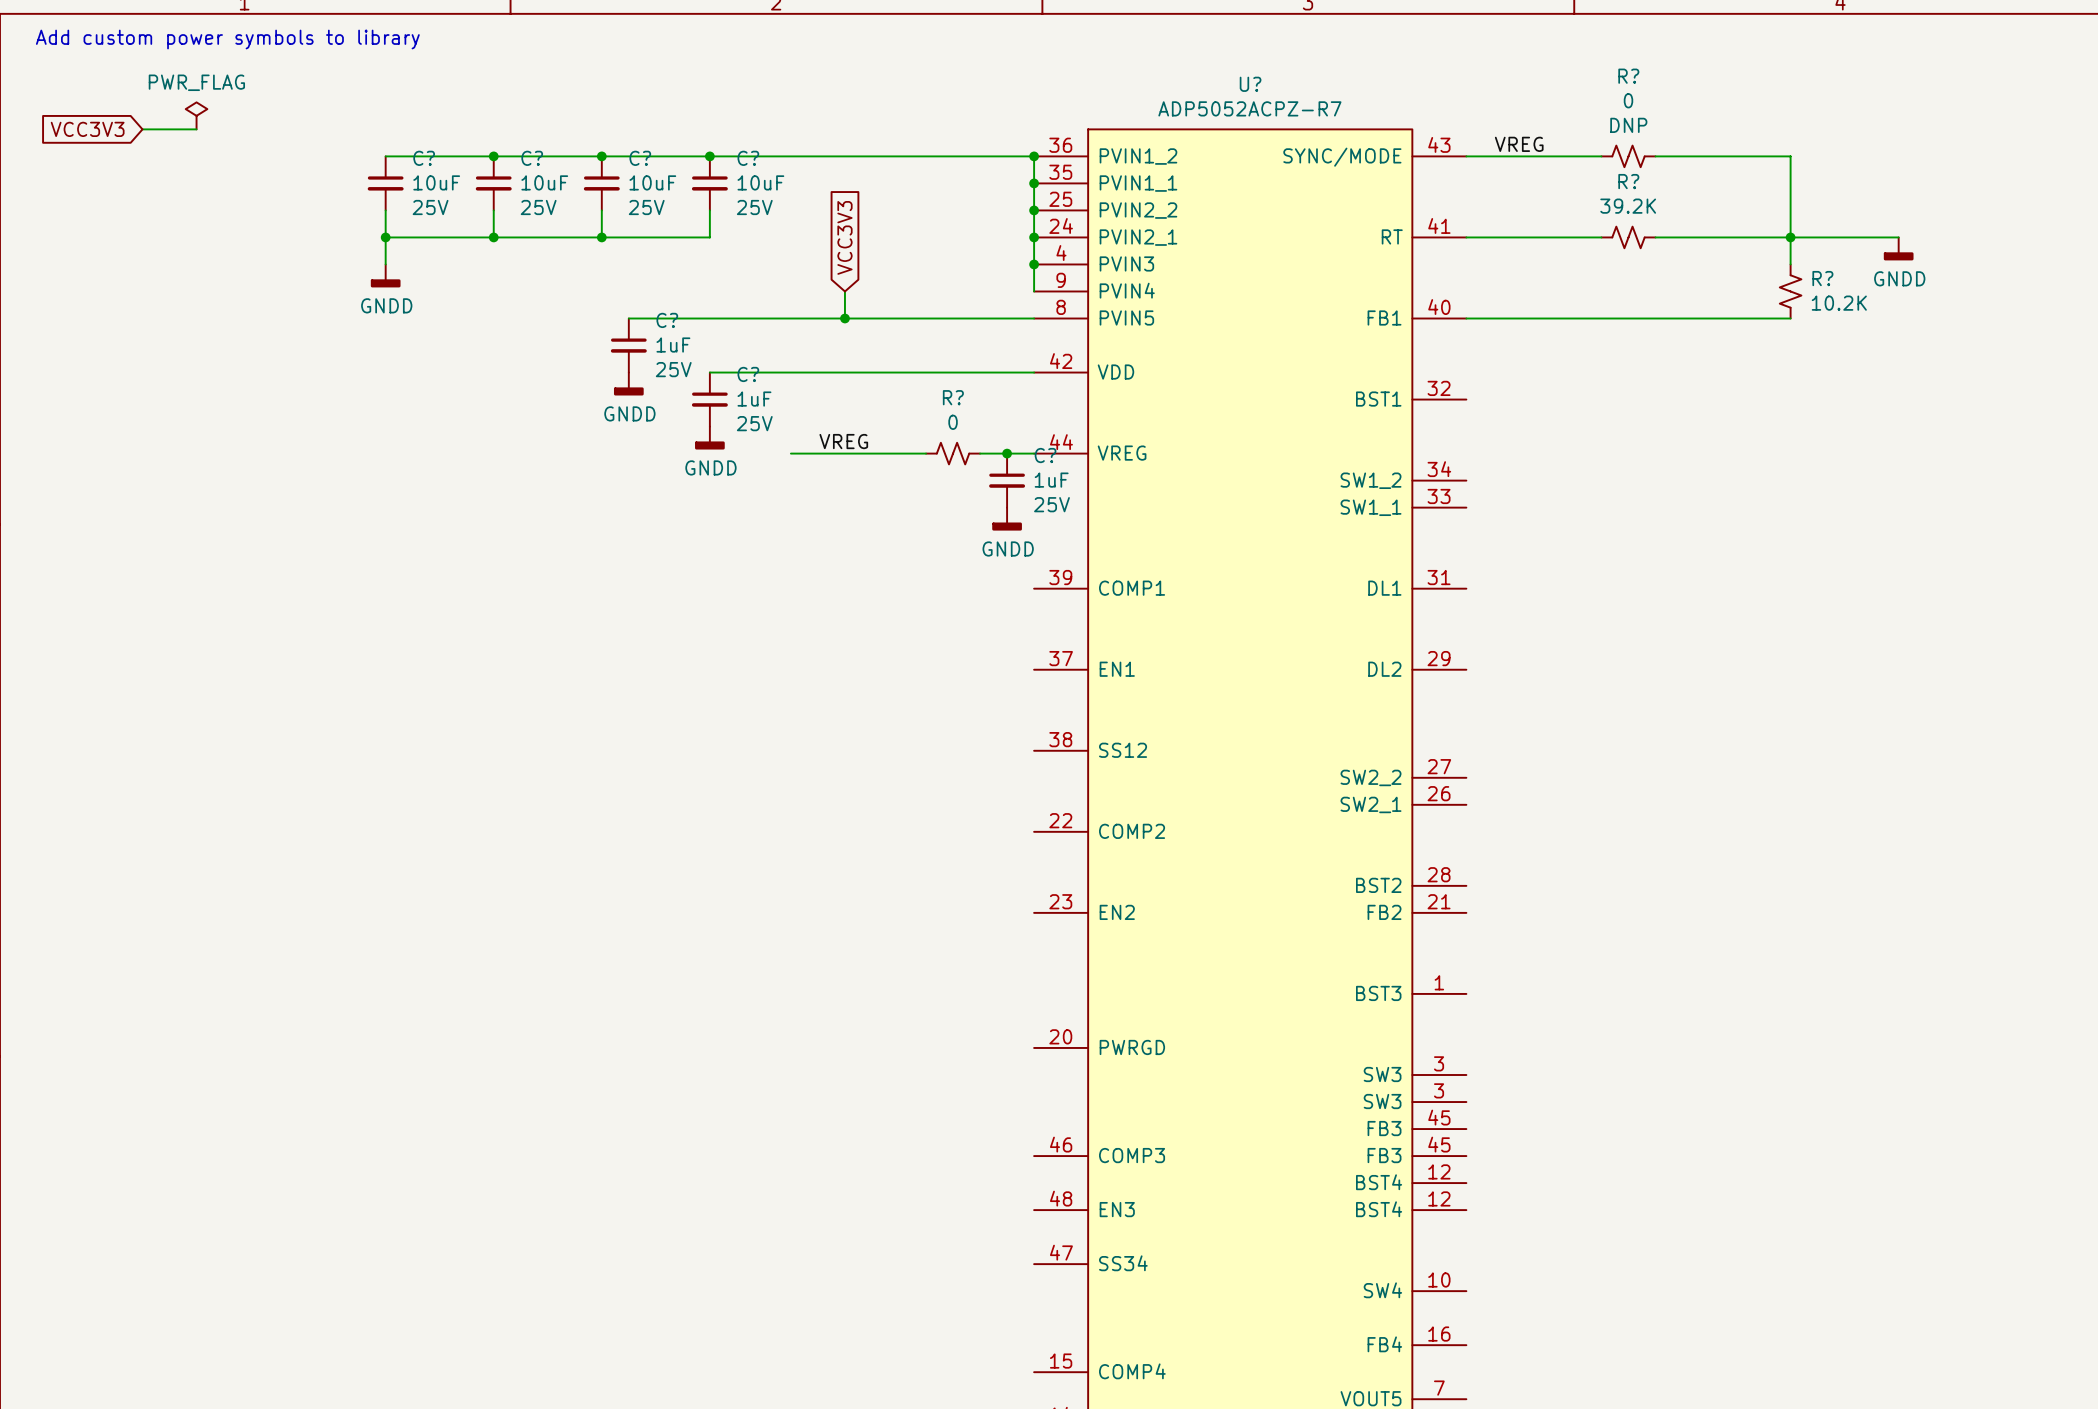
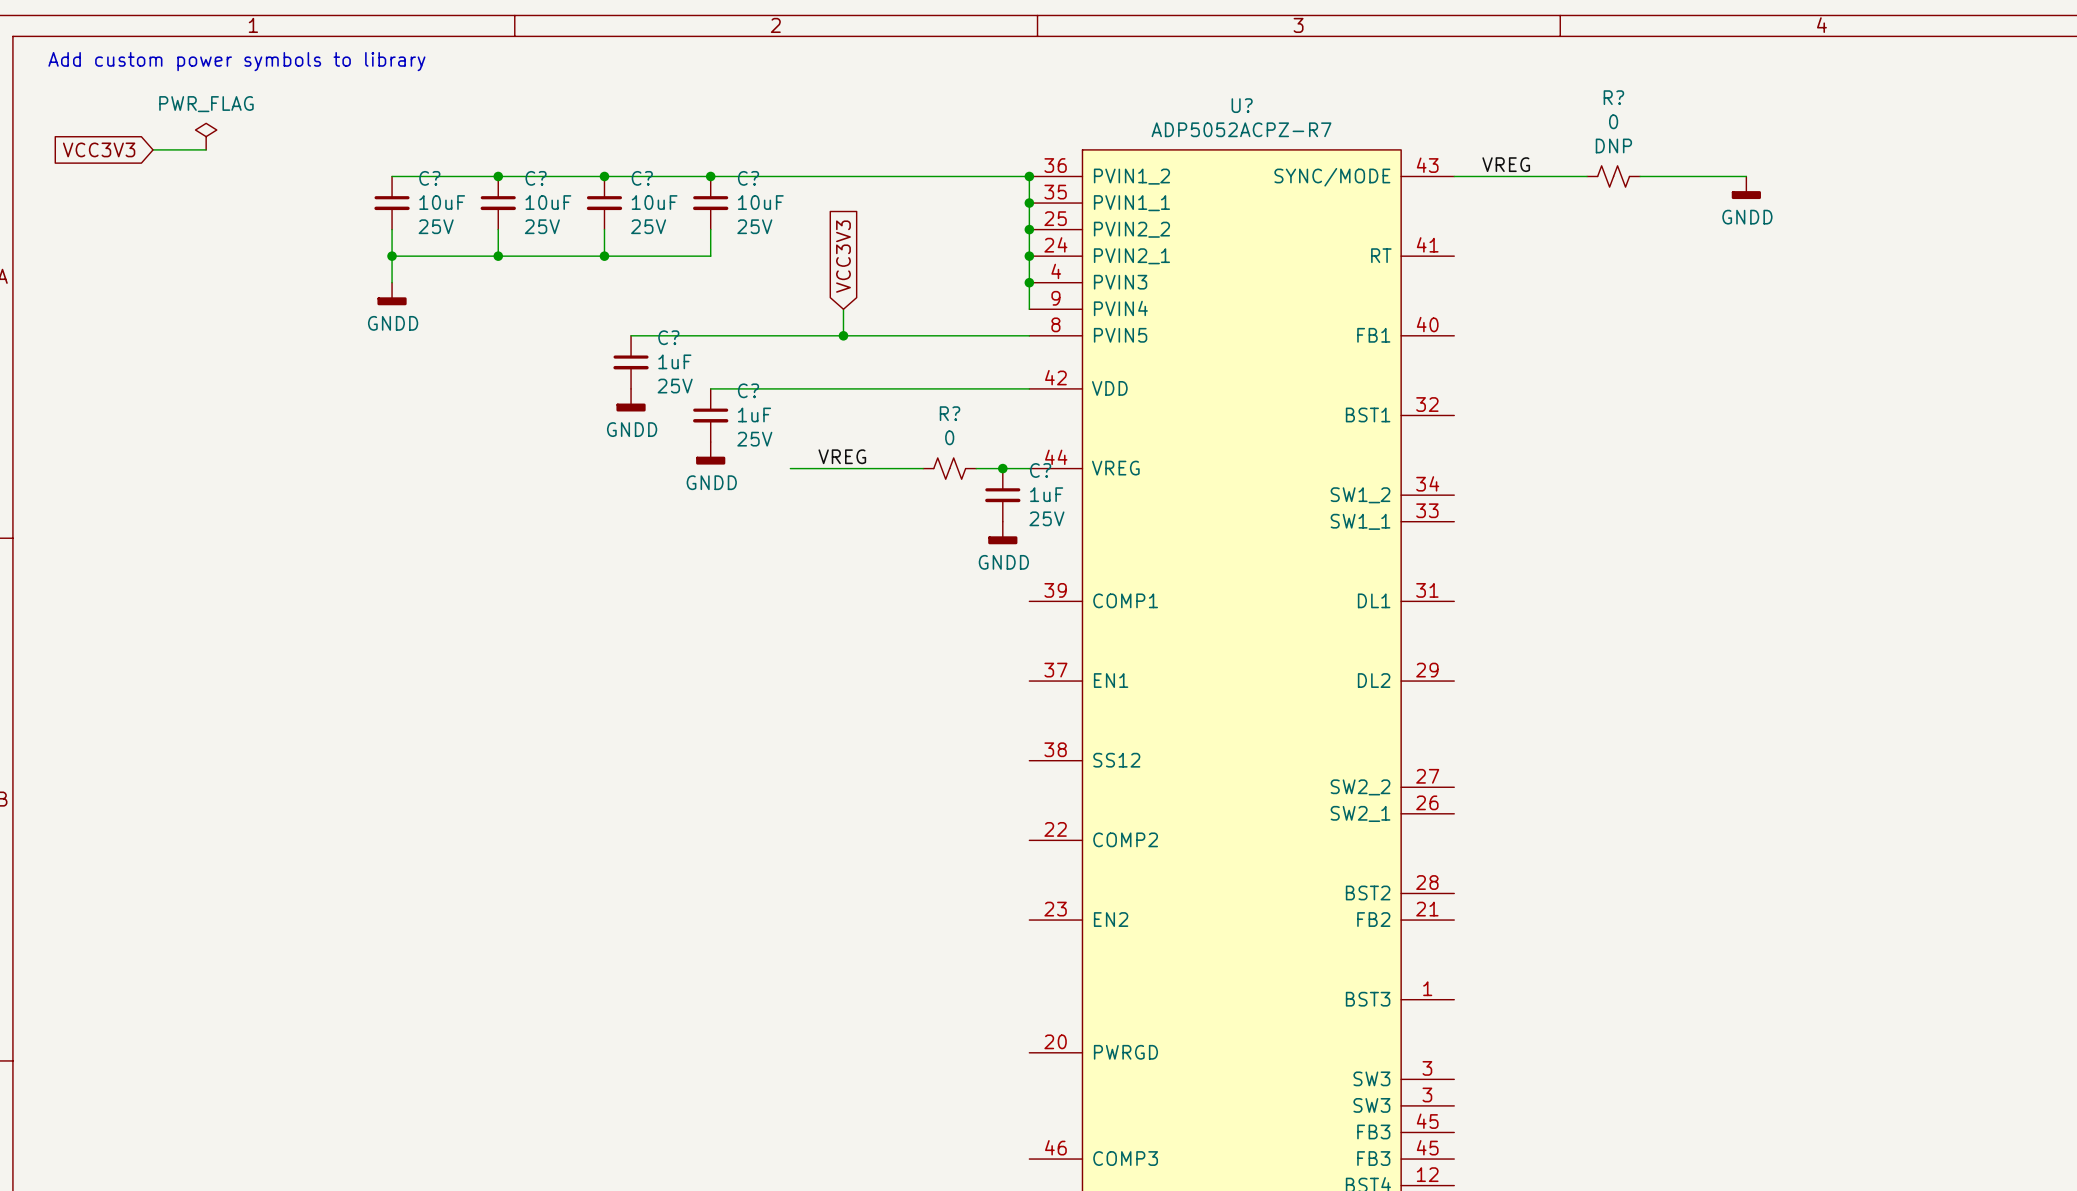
wire: (1763, 156) (1790, 156) (1790, 264) -> none
wire: (1466, 237) (1601, 237) -> none
R?: 39.2K (1628, 237) -> none
wire: (1655, 237) (1898, 237) -> none
junction: (1790, 237) -> none
power symbol position: GNDD (1898, 248) -> GNDD (1746, 187)
R?: 10.2K (1790, 291) -> none
wire: (1466, 318) (1790, 318) -> none

